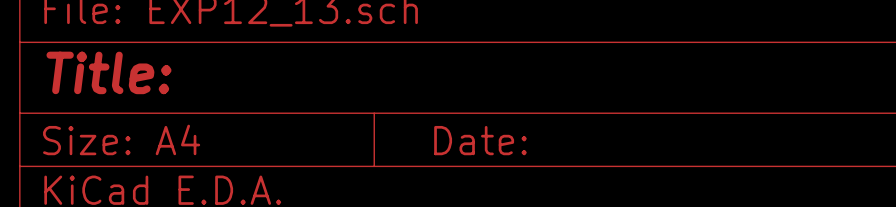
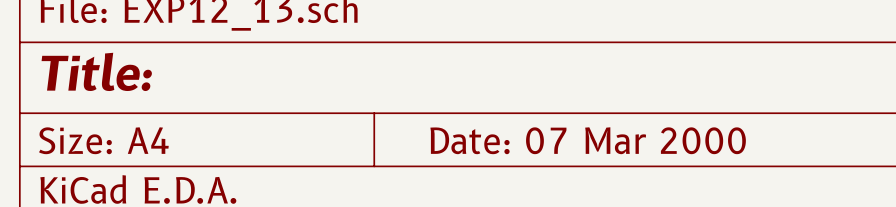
title block: Date: (480, 140) -> Date: 07 Mar 2000 (588, 140)

